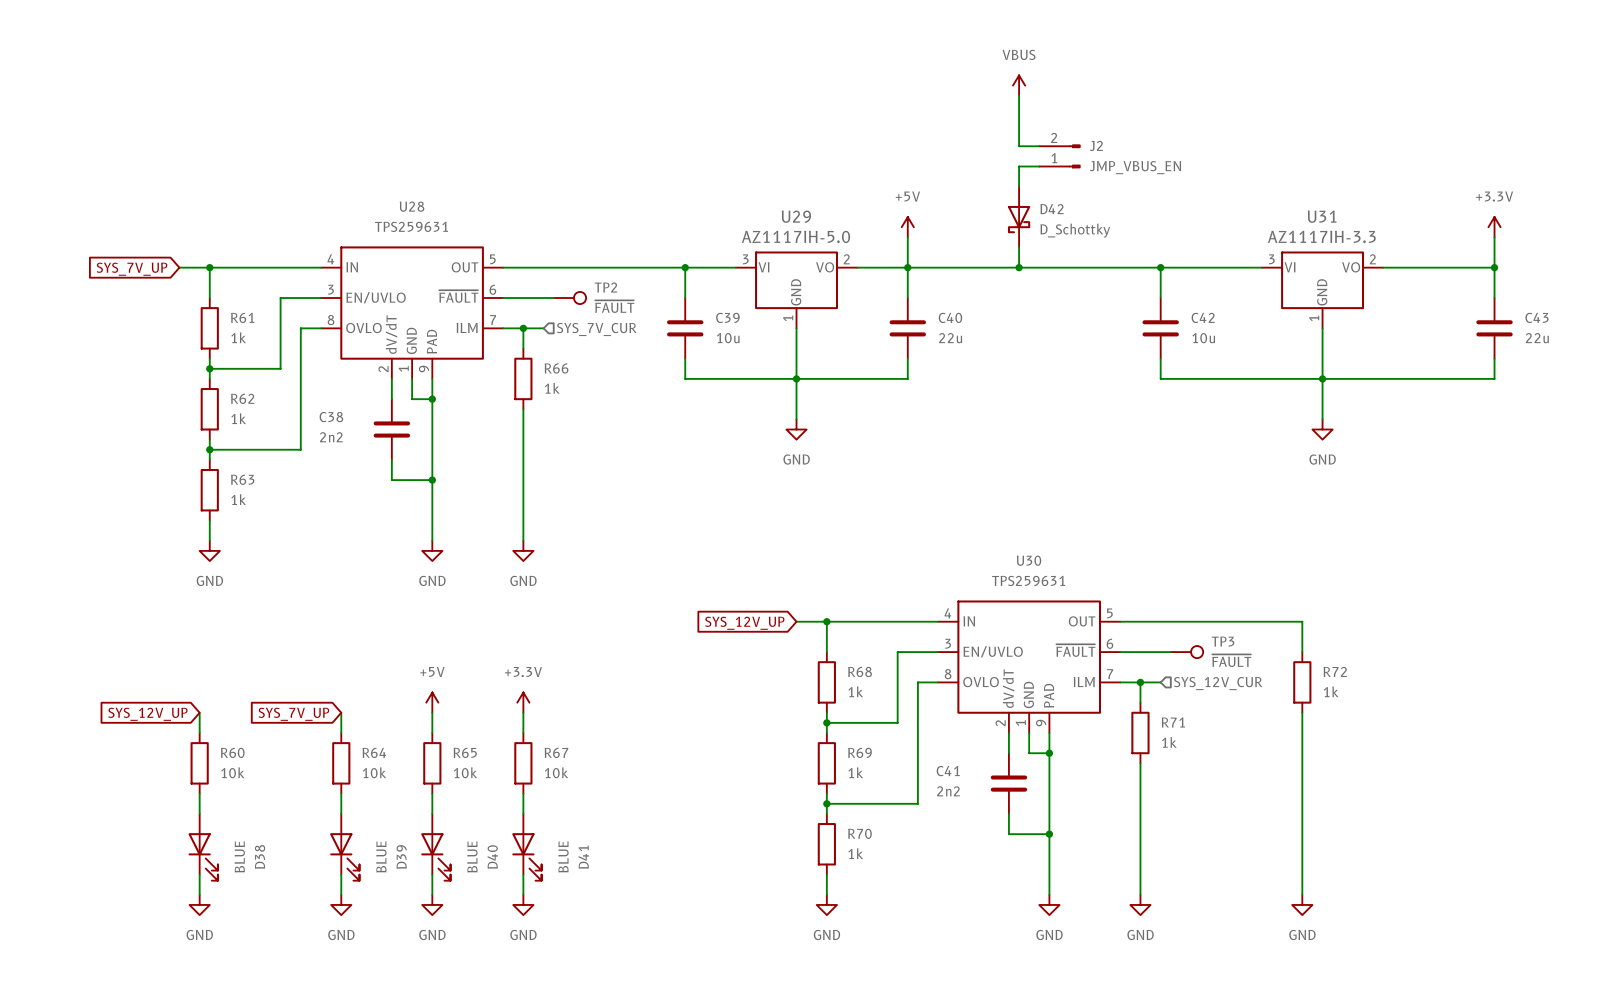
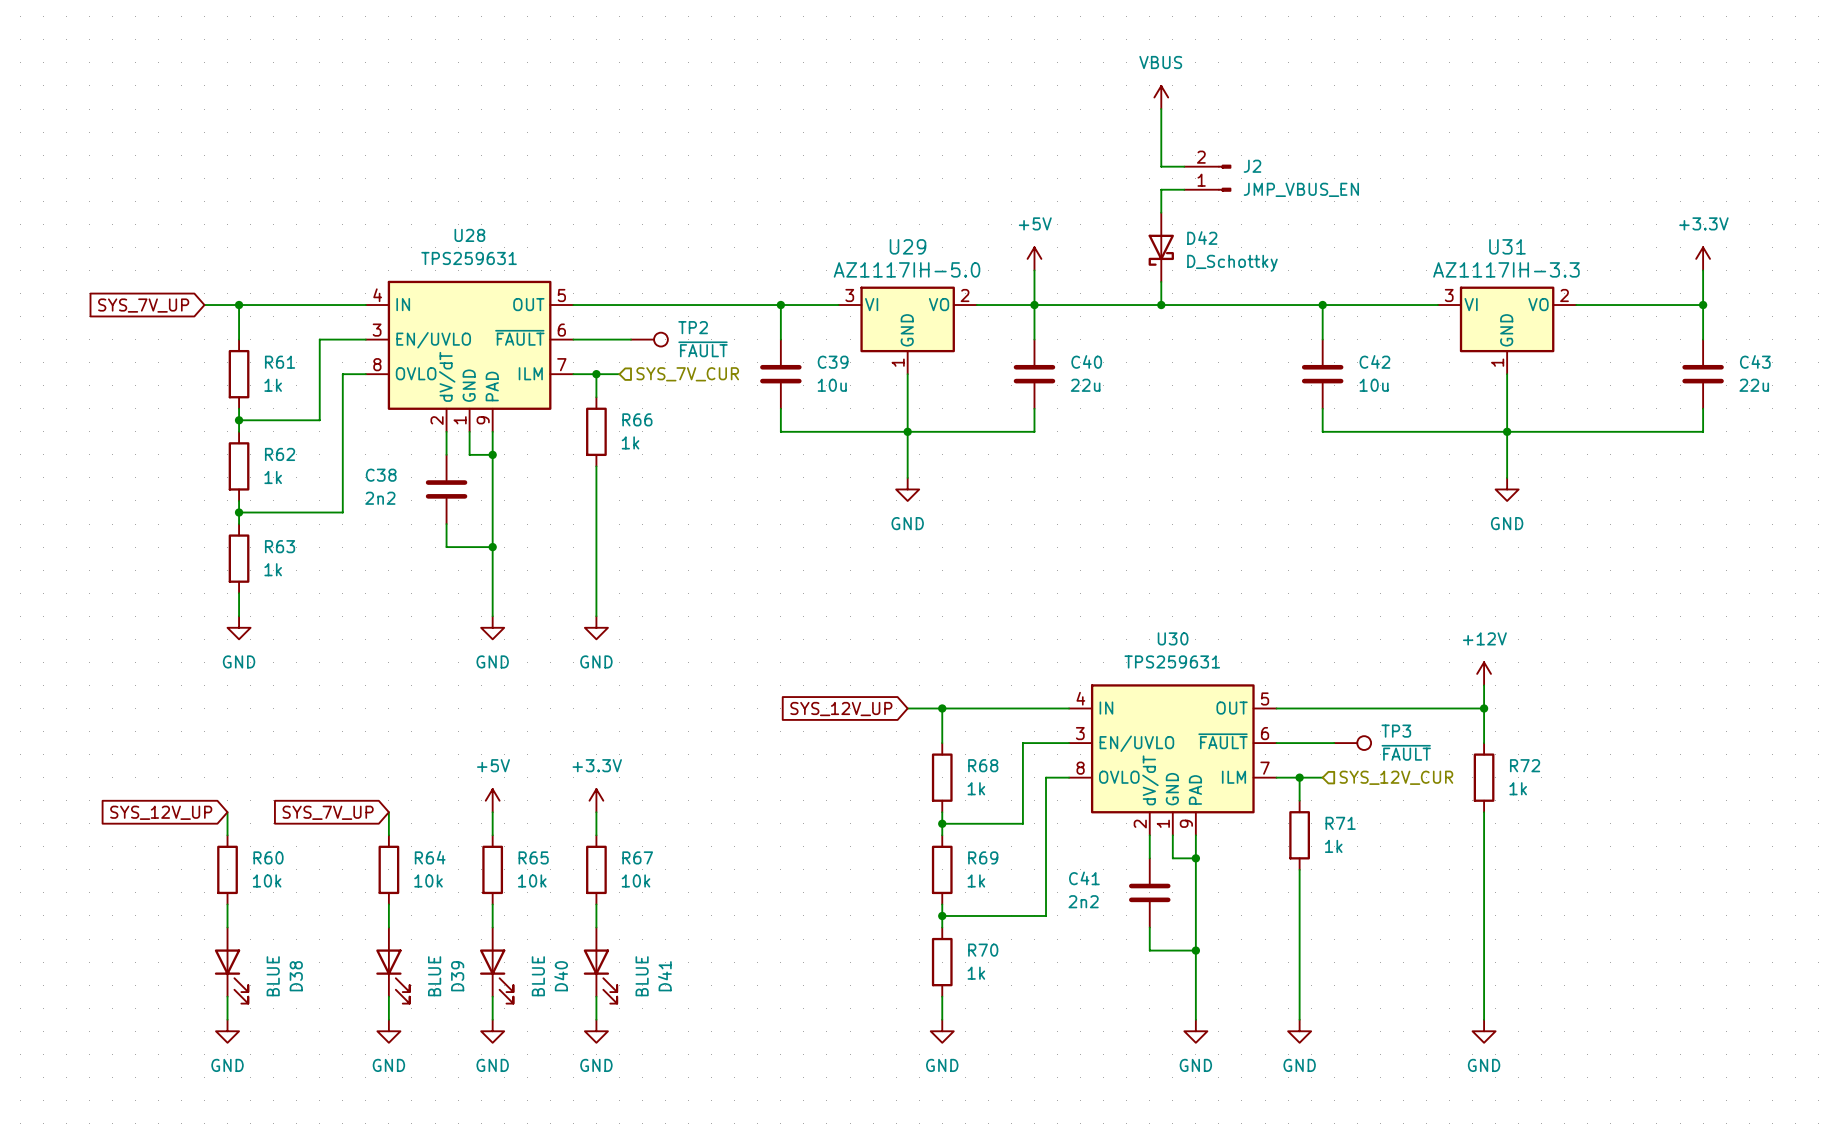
power symbol: none -> +12V (1484, 673)
wire: none -> (1484, 685) (1484, 708)
junction: none -> (1484, 708)

